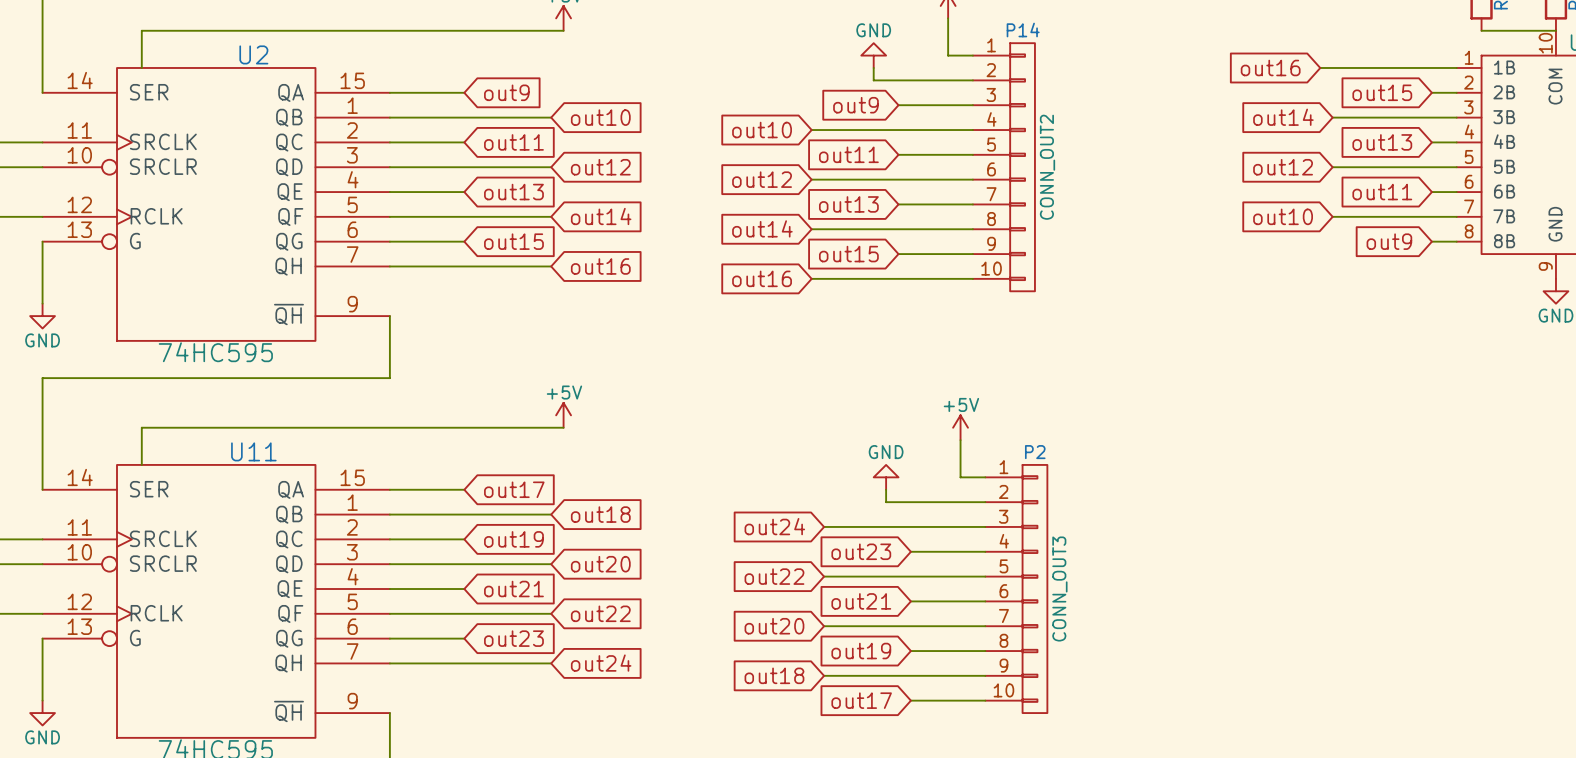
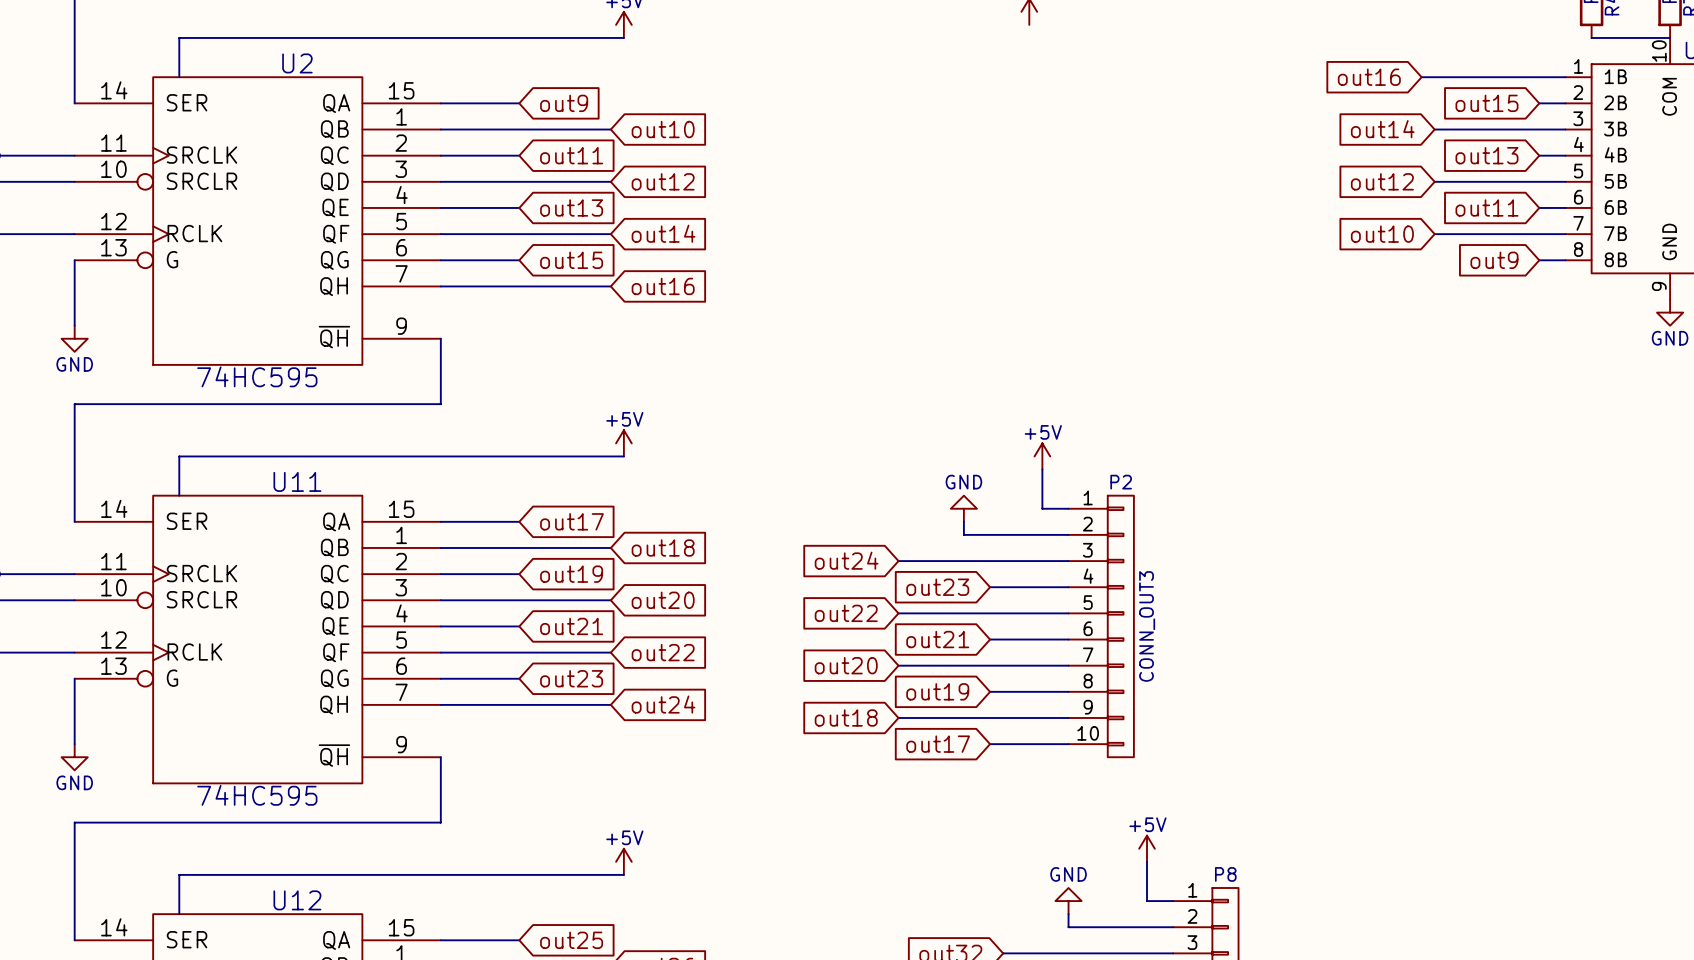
wire: (948, 18) (948, 55) (972, 55) -> none
power symbol: GND (873, 55) -> none
wire: (873, 67) (873, 80) (972, 80) -> none
global label: out9 (855, 105) -> none
wire: (898, 105) (972, 105) -> none
global label: out10 (762, 130) -> none
wire: (811, 130) (972, 130) -> none
global label: out11 (848, 154) -> none
wire: (898, 154) (972, 154) -> none
P14: CONN_OUT2 (1003, 167) -> none
global label: out12 (762, 179) -> none
wire: (811, 179) (972, 179) -> none
global label: out13 (848, 204) -> none
wire: (898, 204) (972, 204) -> none
global label: out14 (762, 228) -> none
wire: (811, 229) (972, 229) -> none
global label: out15 (848, 254) -> none
wire: (898, 254) (972, 254) -> none
global label: out16 (762, 278) -> none
wire: (811, 278) (972, 278) -> none

